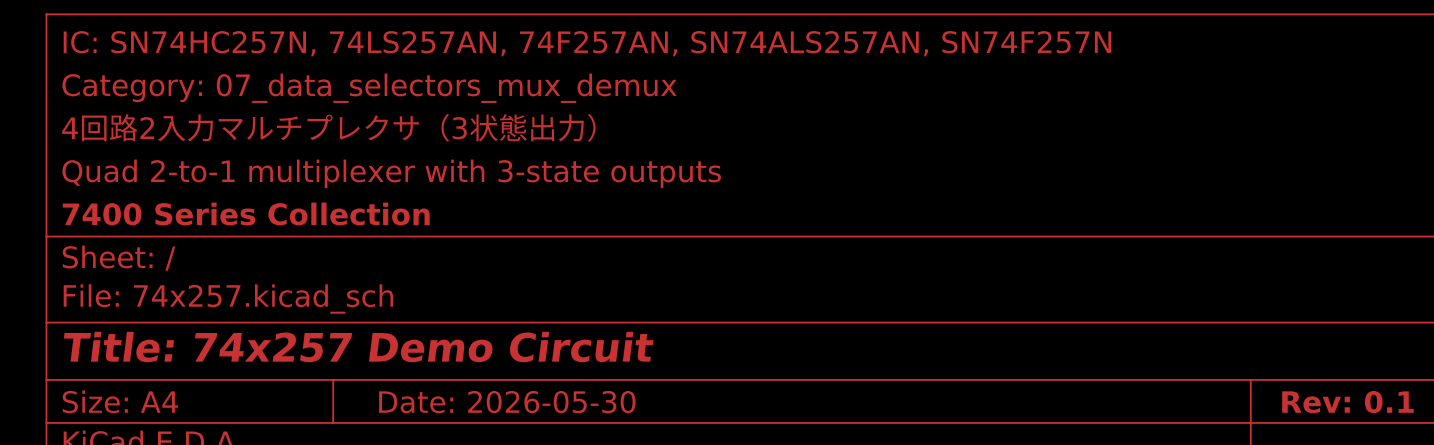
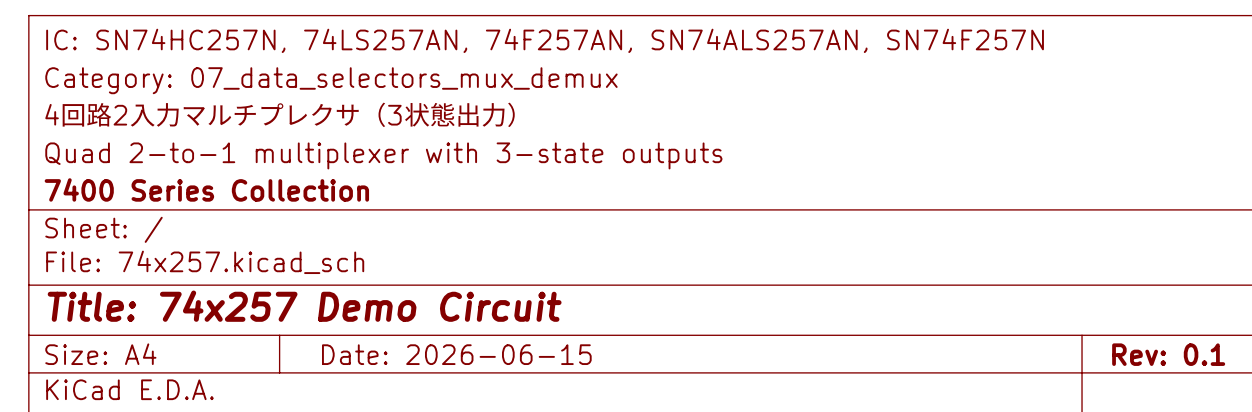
title block: Date: 2026-05-30 (507, 402) -> Date: 2026-06-15 (456, 354)

